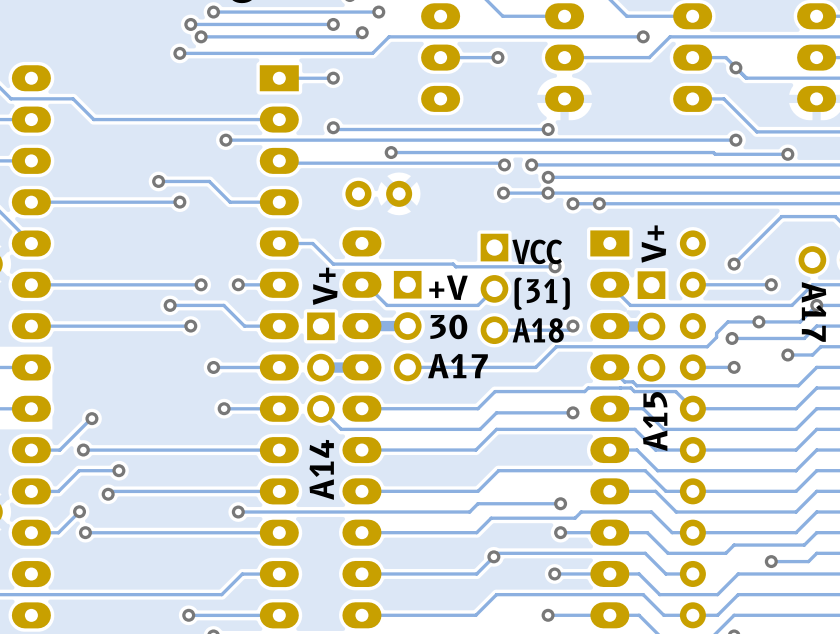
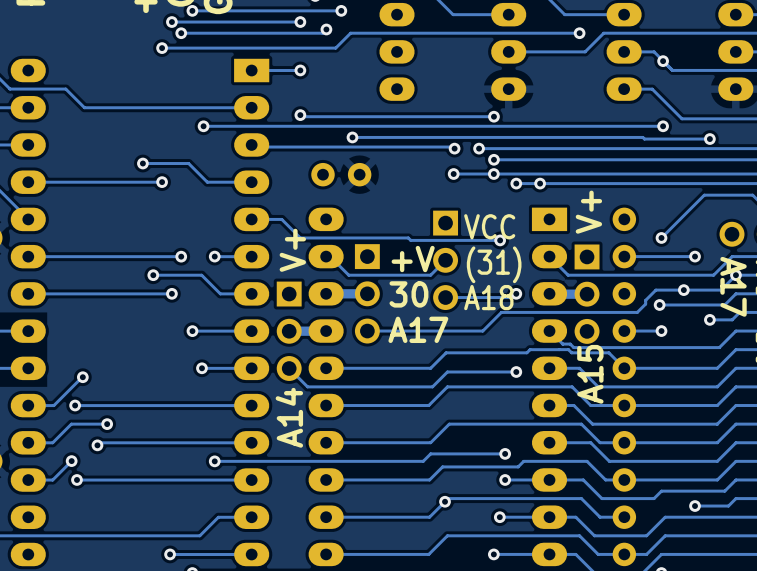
track: (497, 57) (440, 57) -> none
via: (497, 57) -> none

